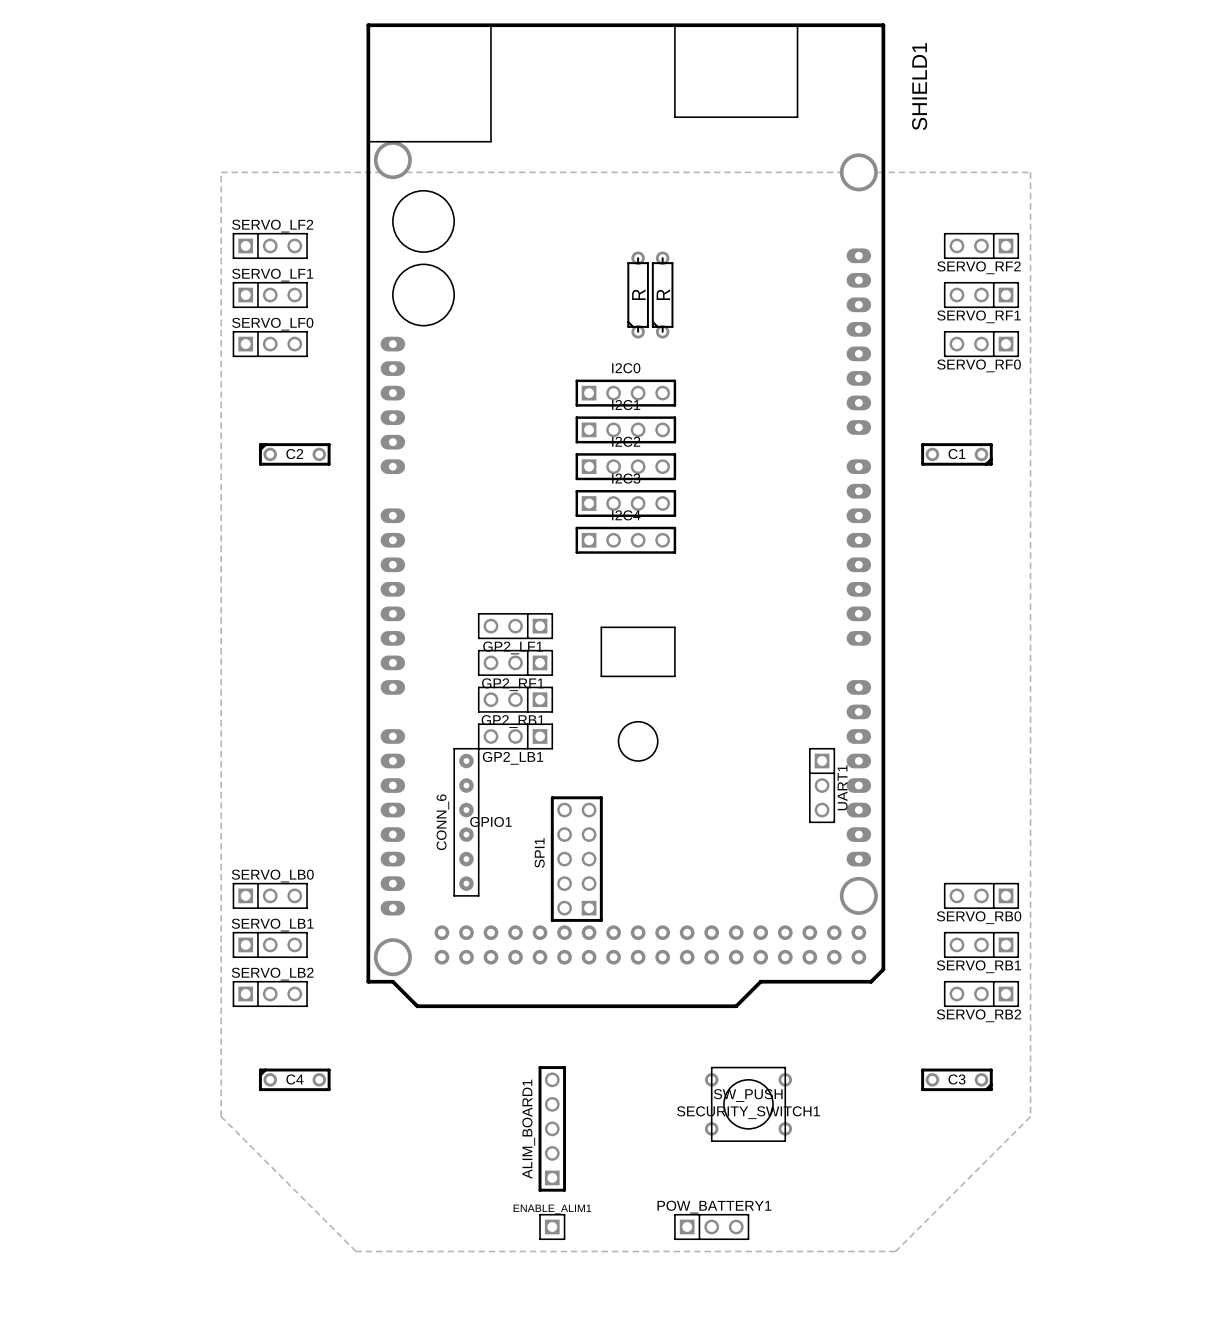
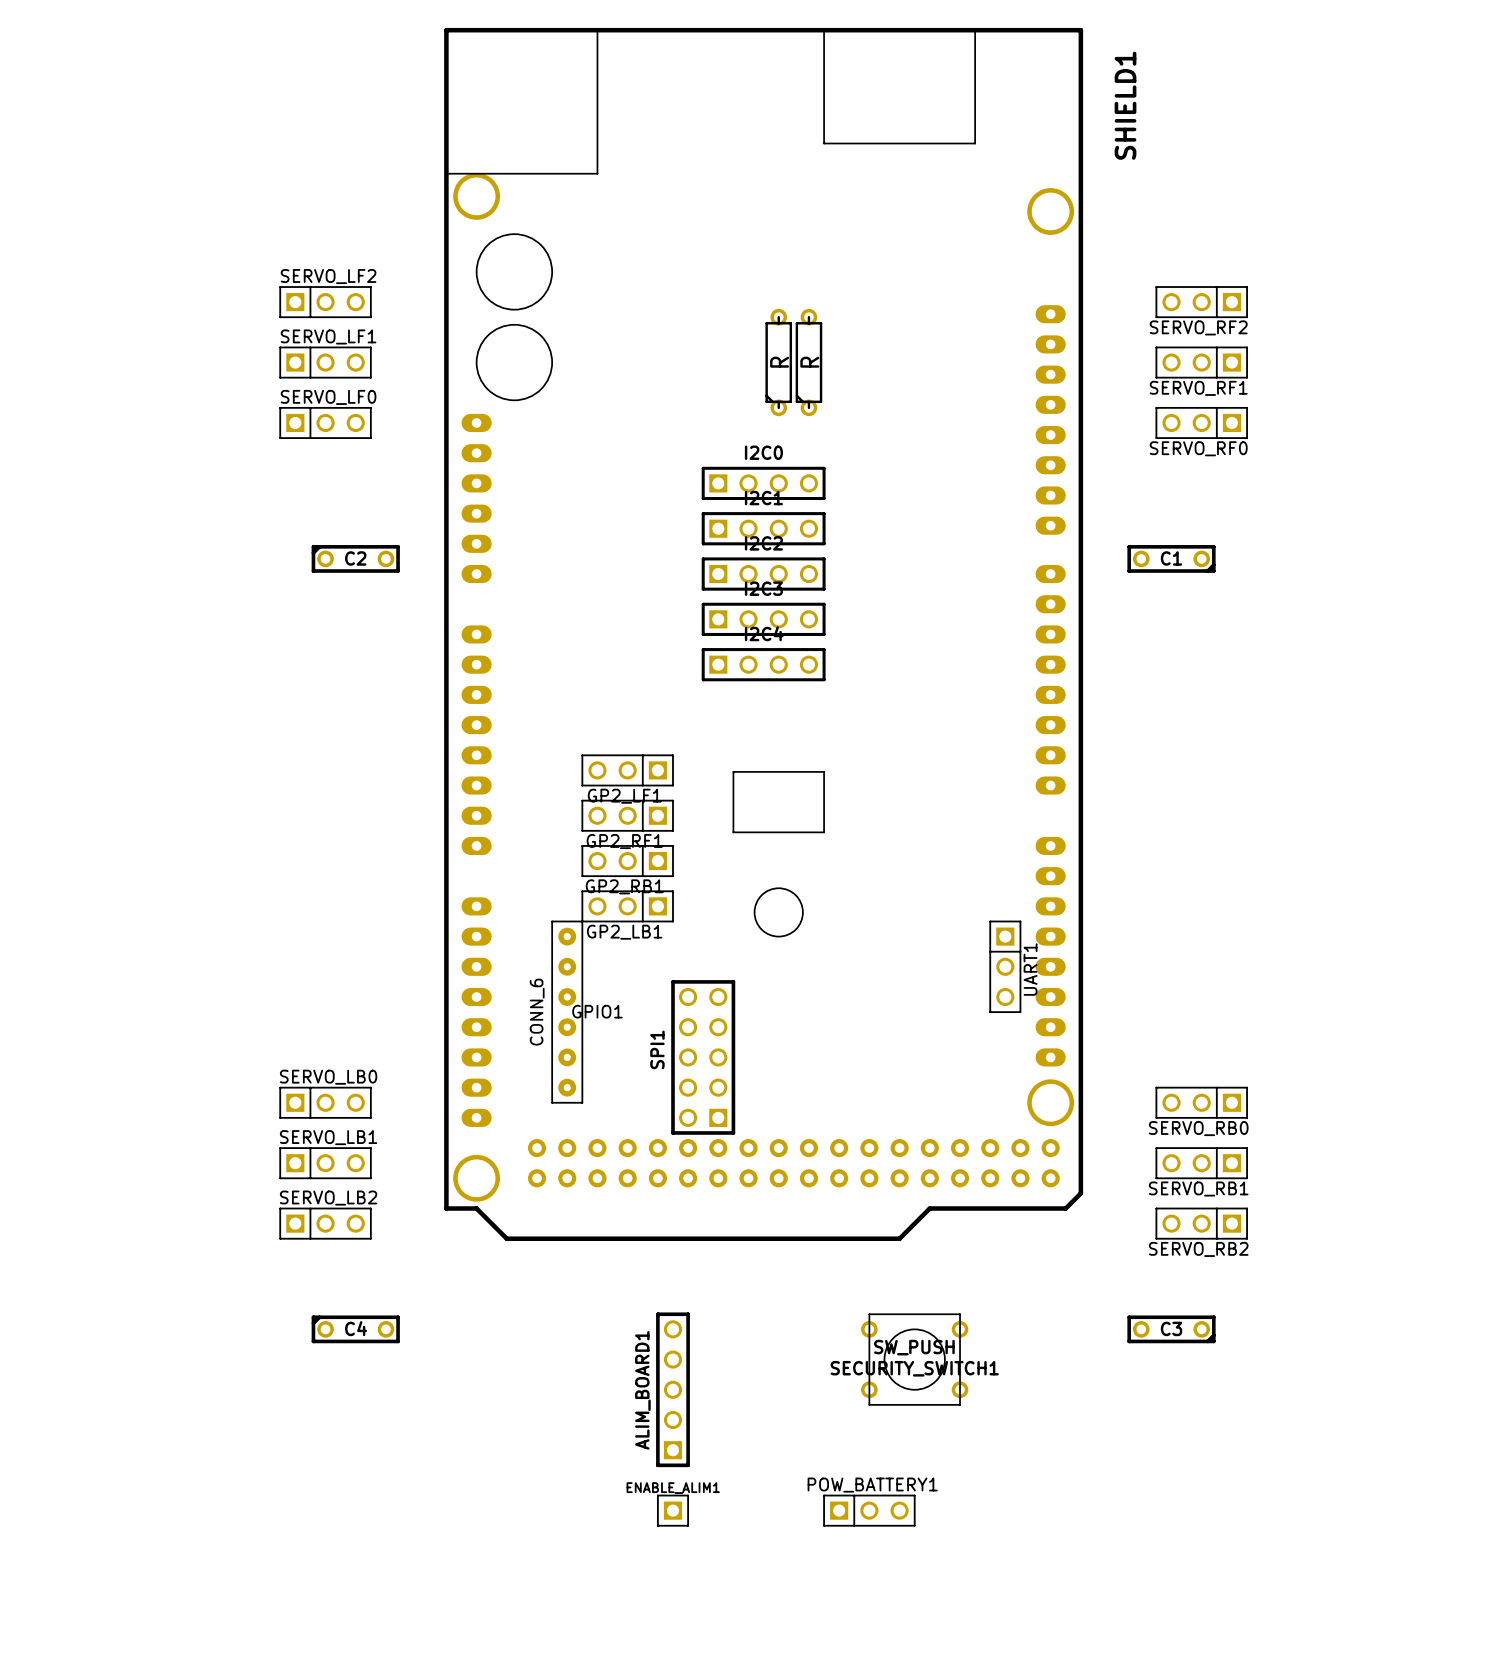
zone outline: (221, 172) (221, 1116) (356, 1251) (895, 1251) (1030, 1116) (1030, 172) (221, 172) -> none

